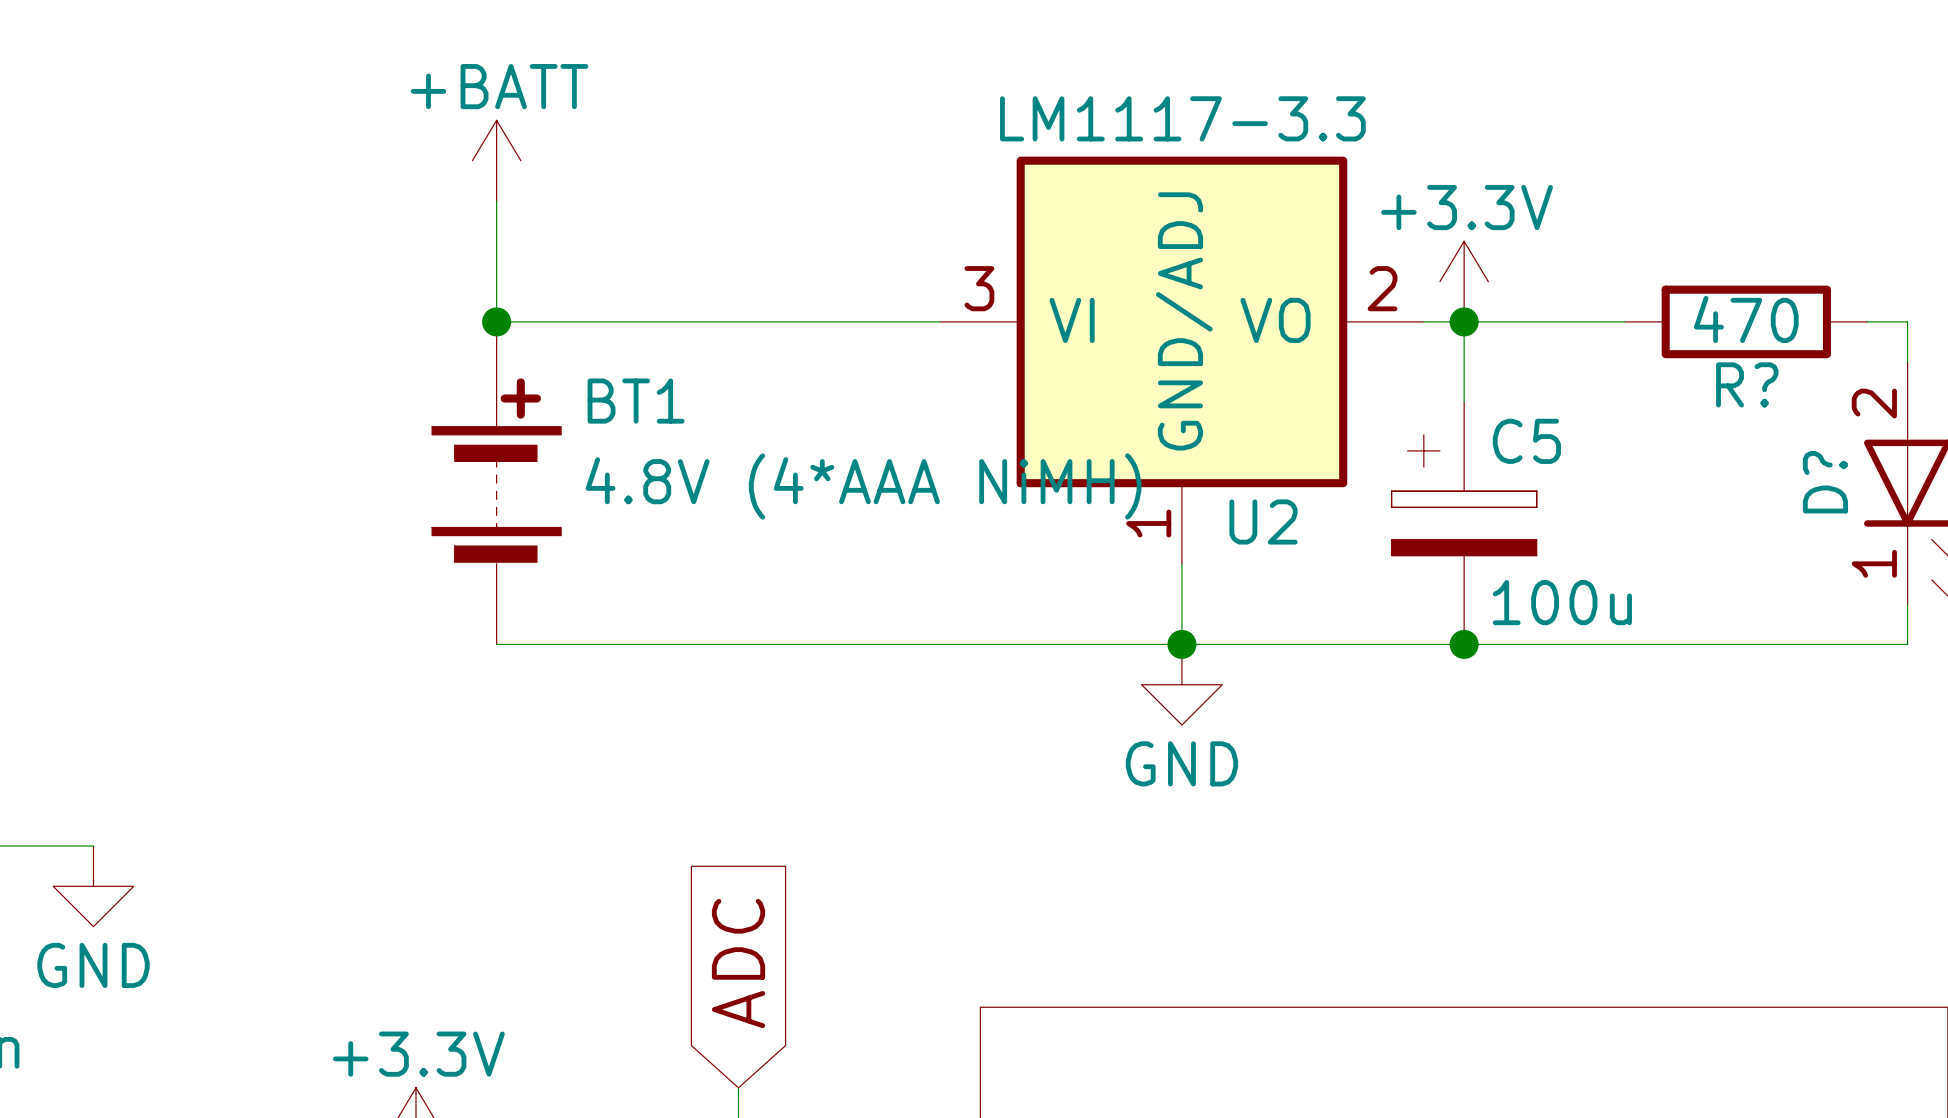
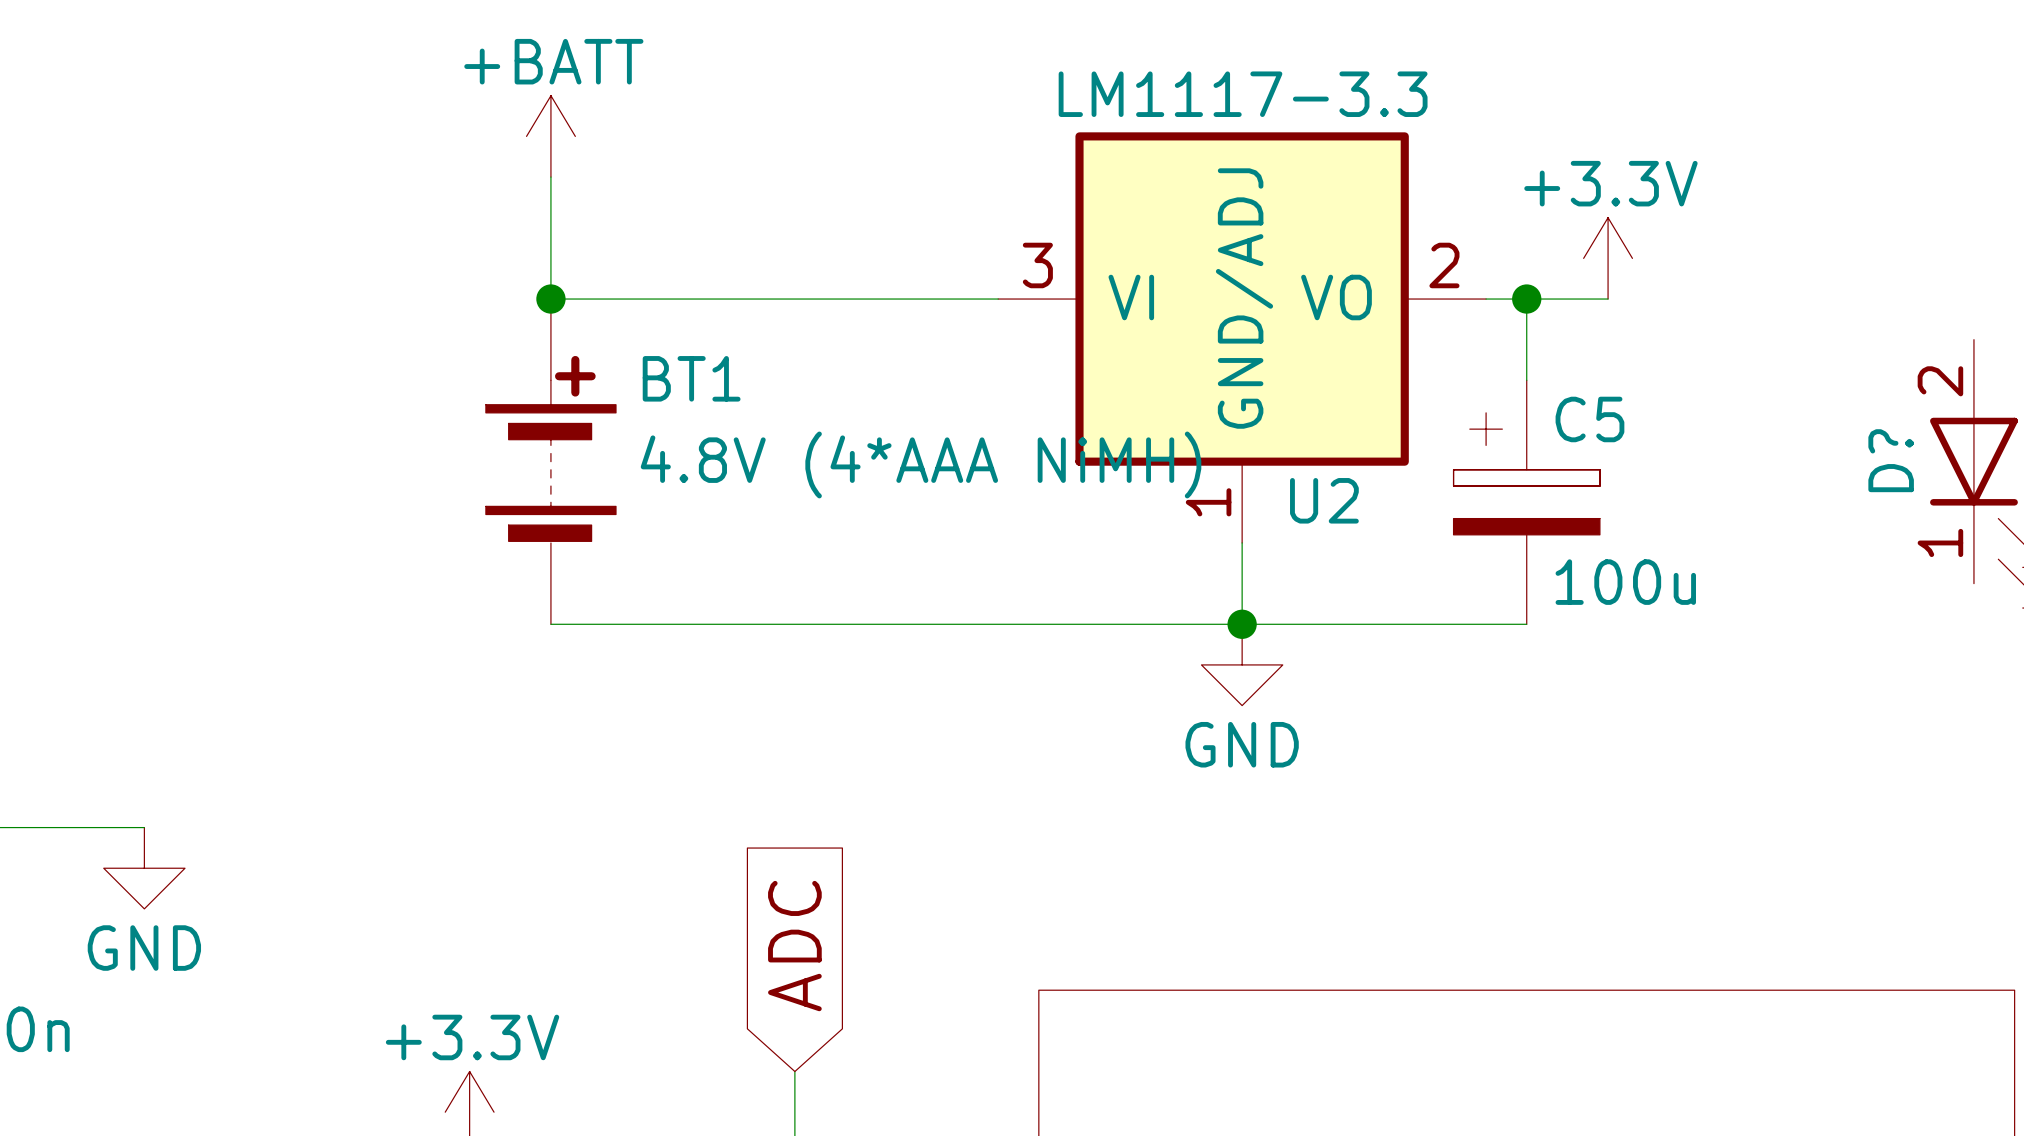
power symbol position: +3.3V (1464, 281) -> +3.3V (1608, 258)
wire: (1544, 321) (1625, 321) -> none
R?: 470 (1746, 321) -> none
wire: (1867, 321) (1907, 321) (1907, 362) -> none
wire: (1907, 604) (1907, 644) (1464, 644) -> none
junction: (1464, 644) -> none

